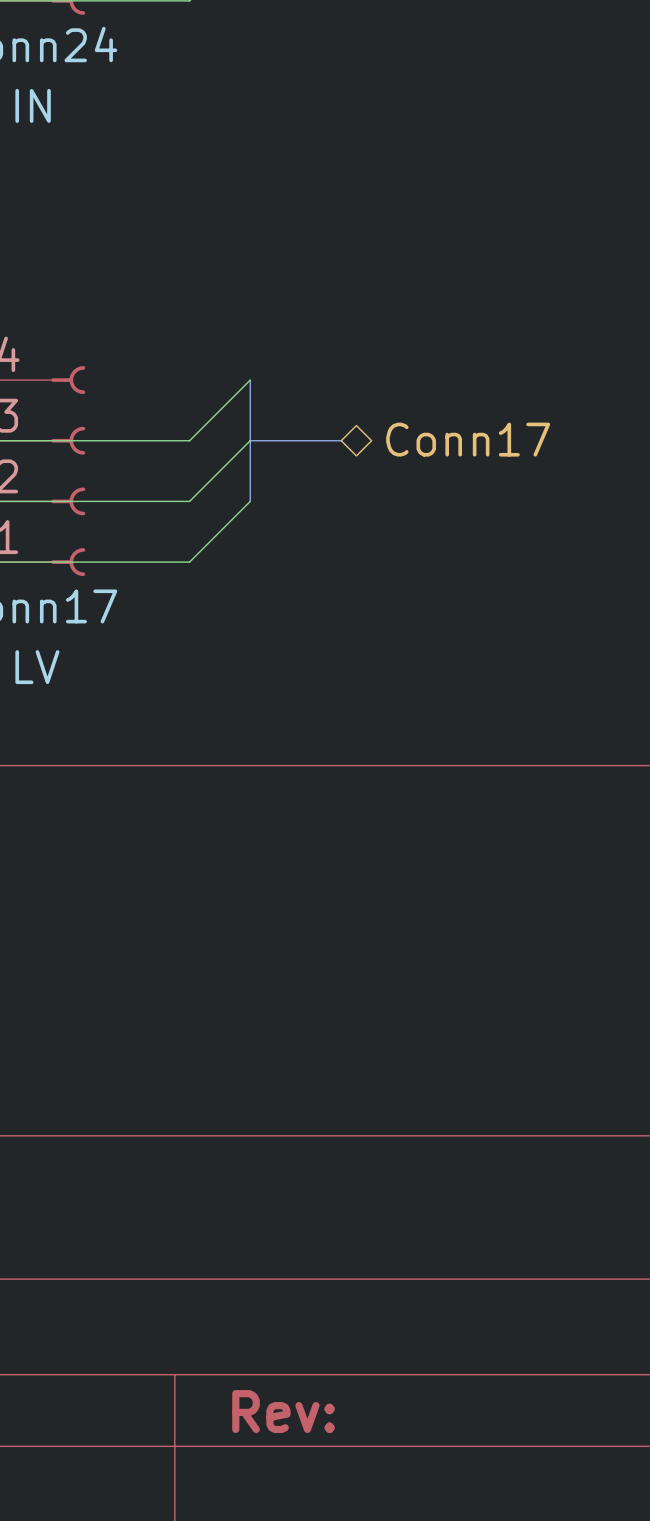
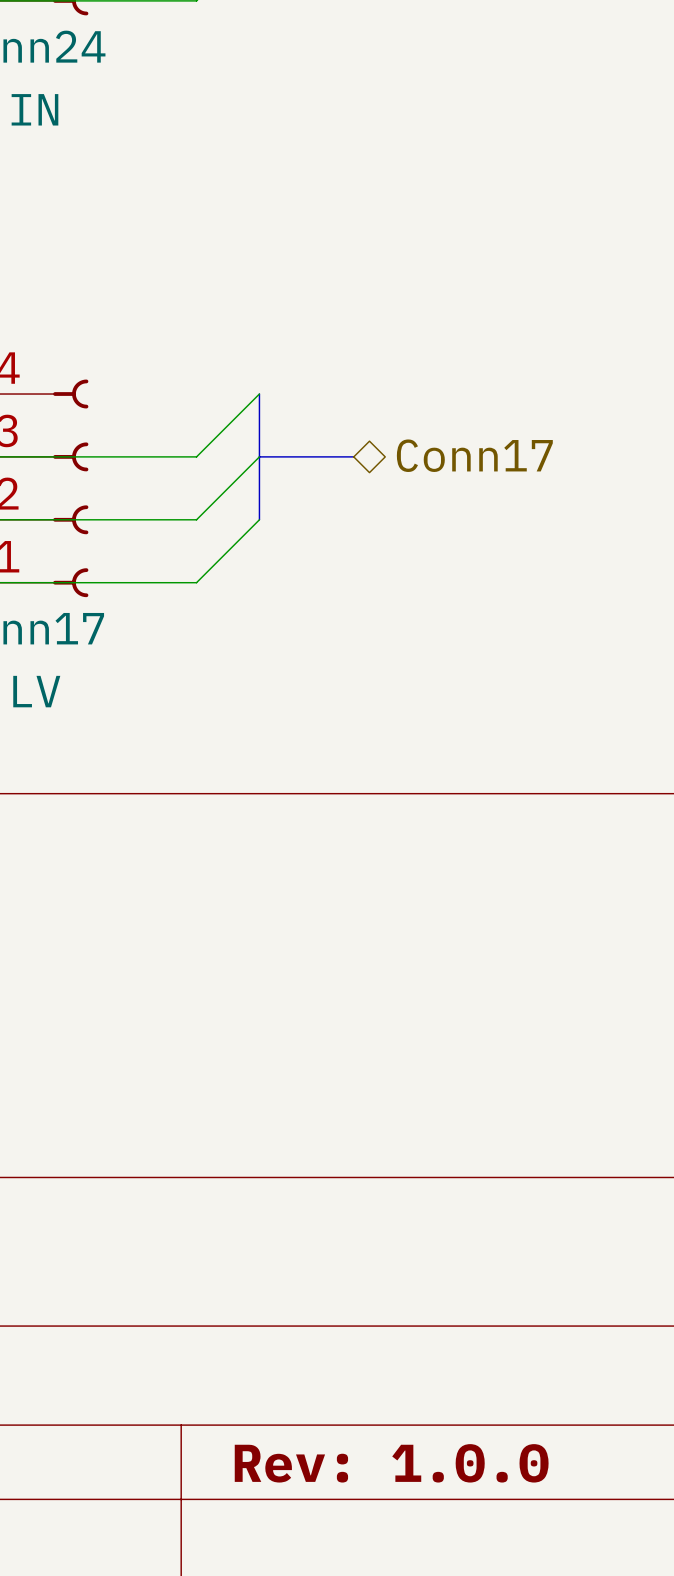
title block: Rev: (283, 1411) -> Rev: 1.0.0 (391, 1463)

